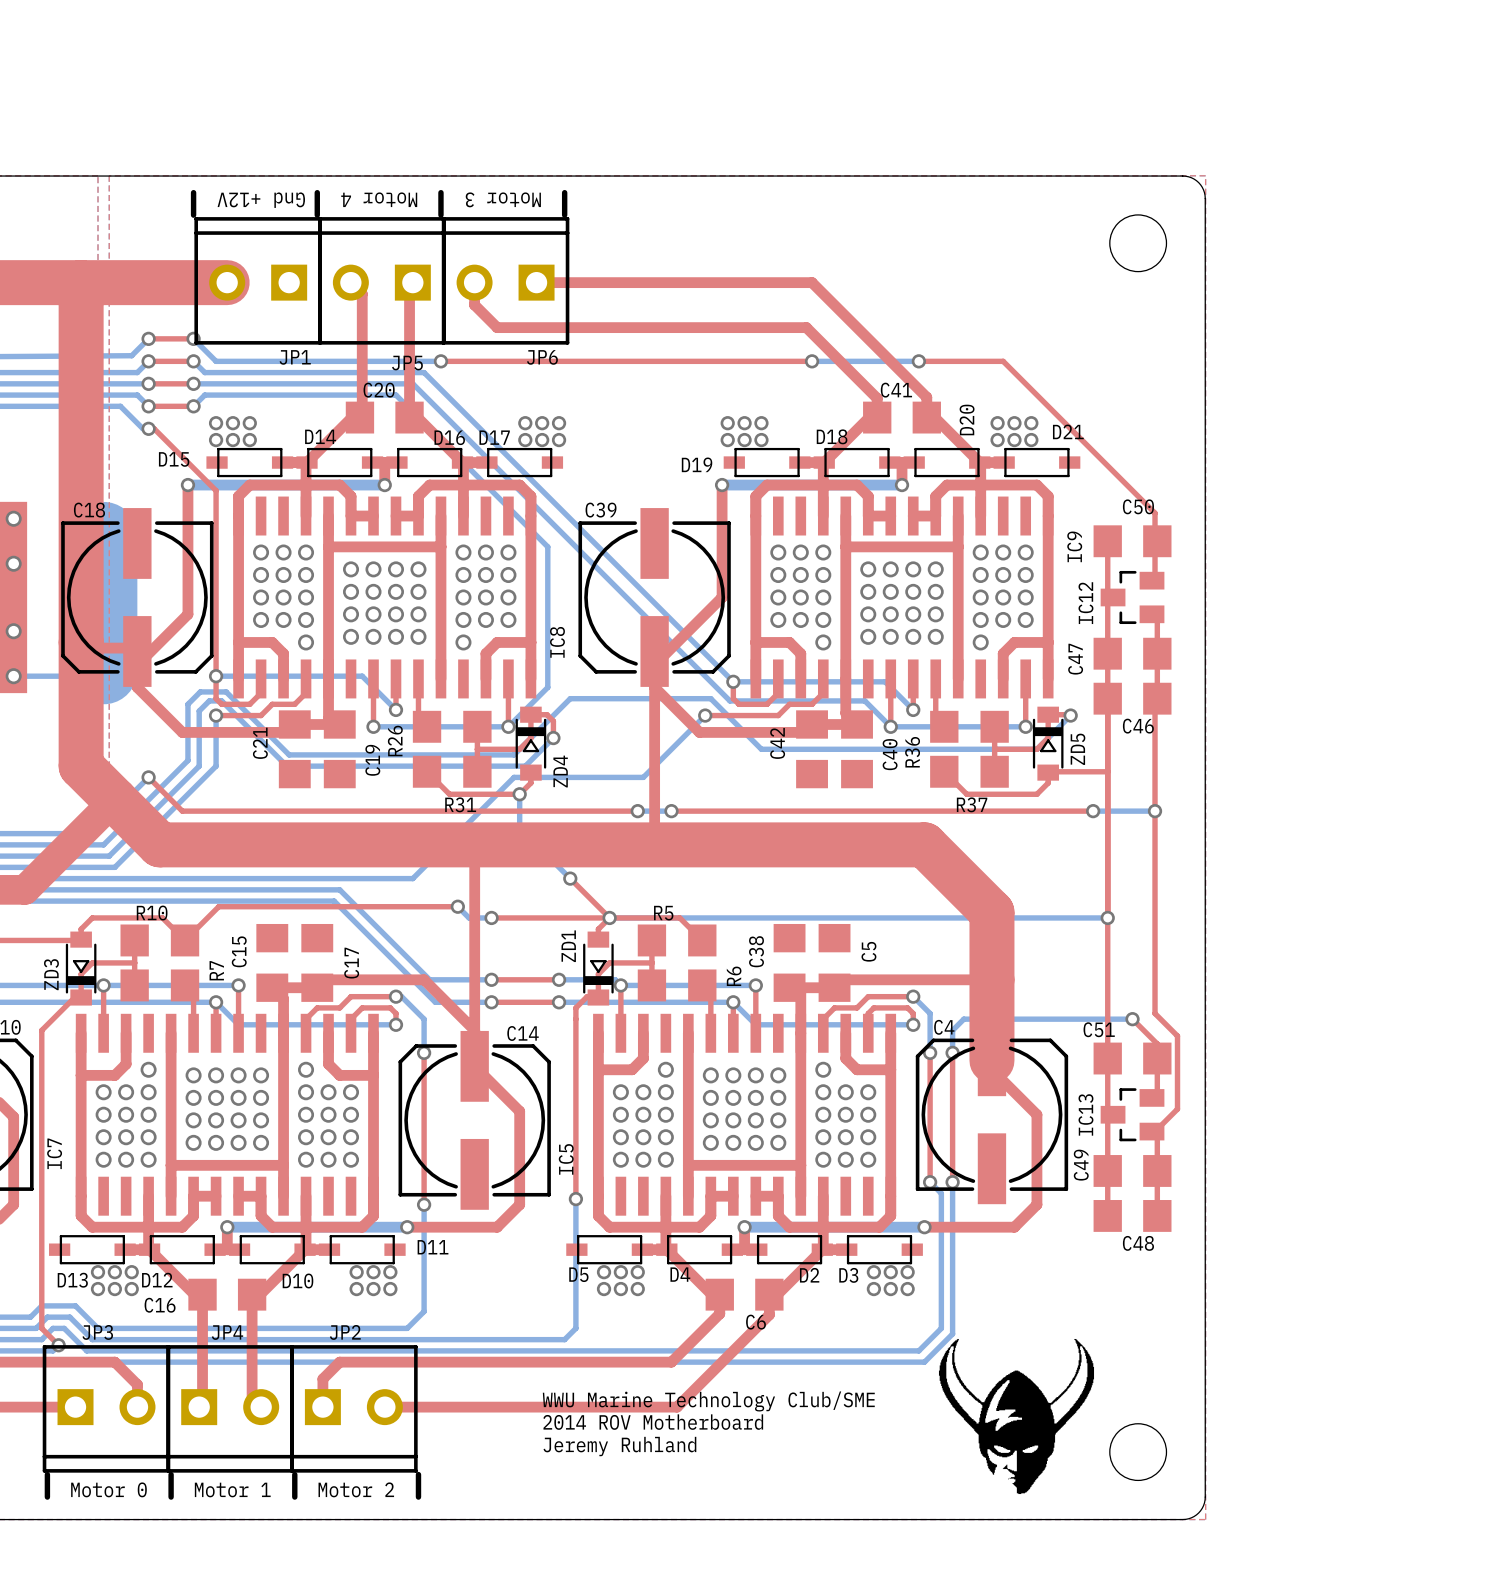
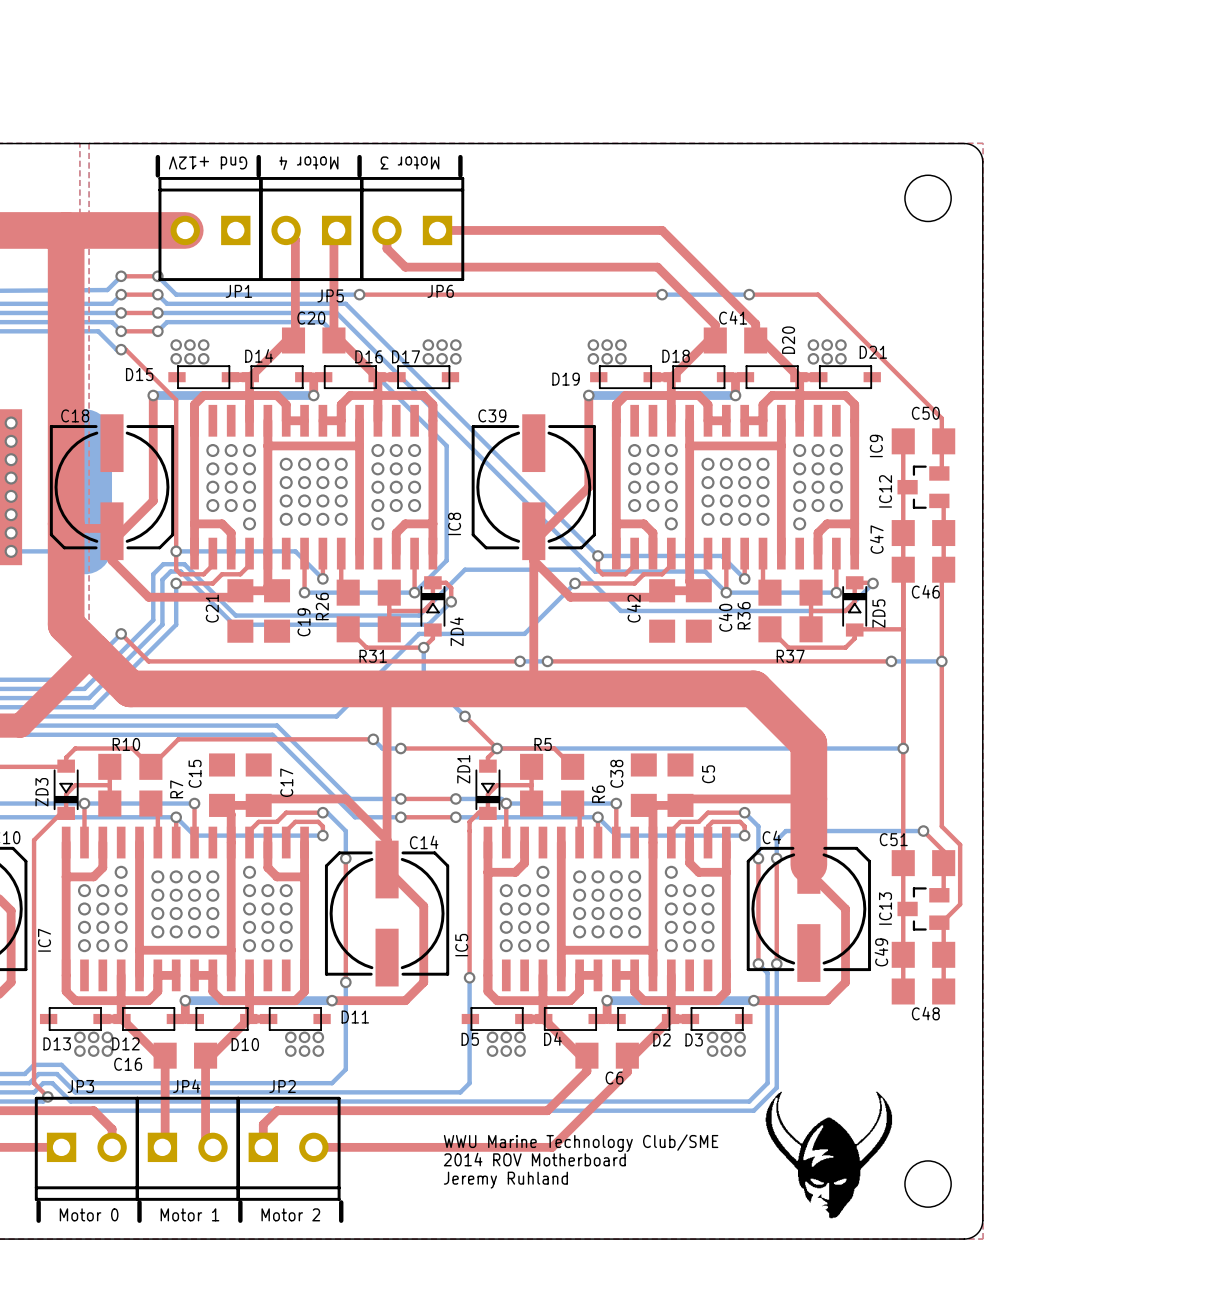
via: none -> (11, 441)
via: none -> (11, 478)
via: none -> (11, 496)
via: none -> (11, 533)

